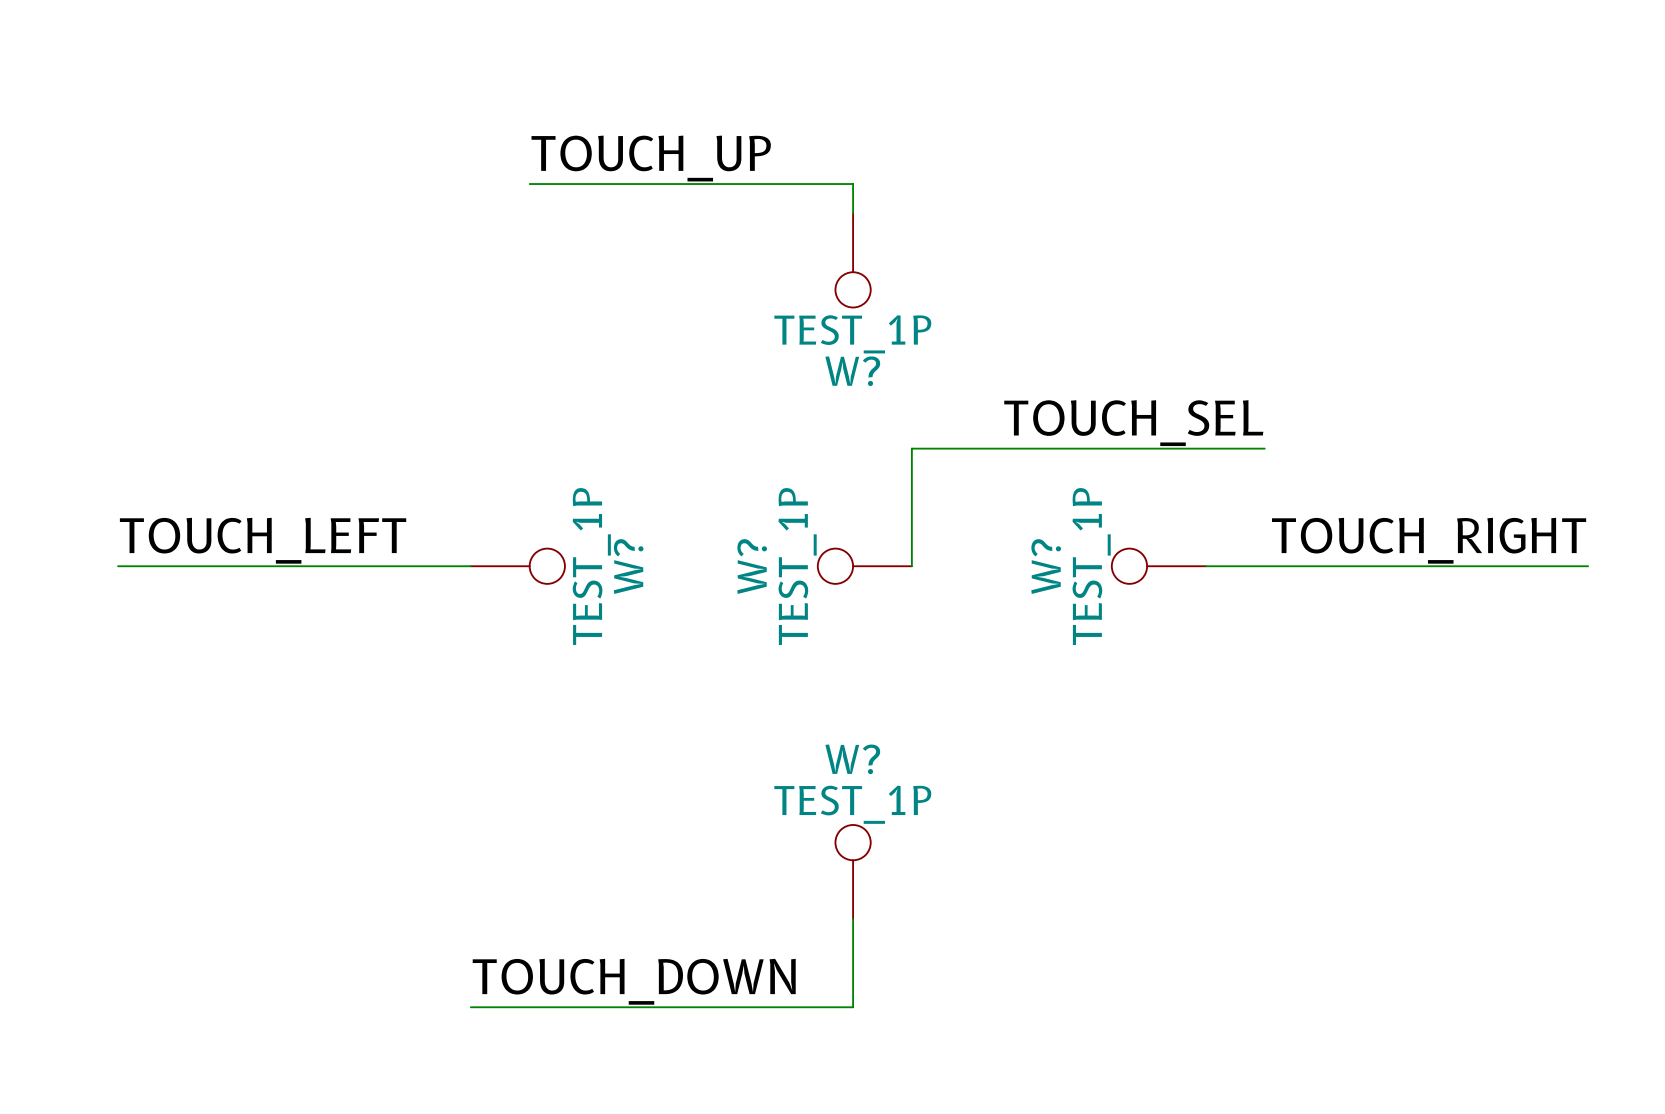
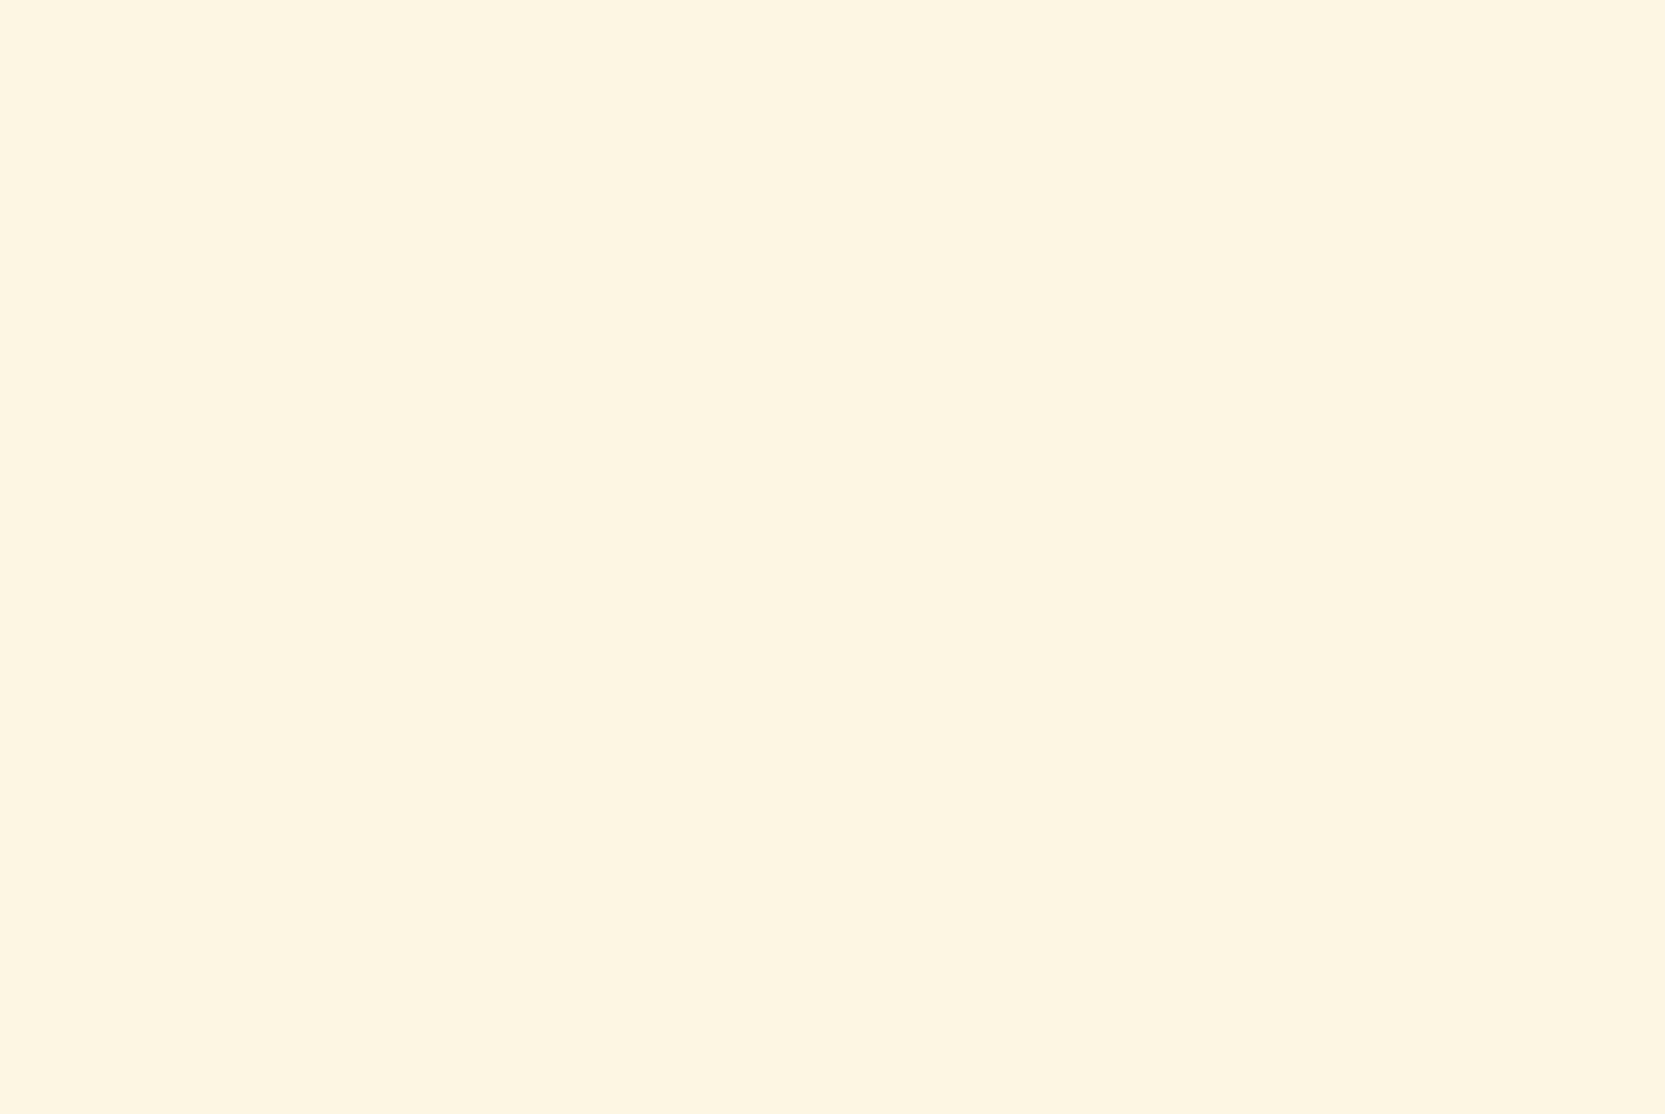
label: TOUCH_UP (651, 158) -> none
wire: (529, 184) (853, 184) (853, 213) -> none
W?: TEST_1P (853, 260) -> none
label: TOUCH_SEL (1133, 423) -> none
wire: (1264, 448) (911, 448) (911, 566) -> none
label: TOUCH_LEFT (263, 540) -> none
label: TOUCH_RIGHT (1429, 540) -> none
wire: (118, 566) (470, 566) -> none
W?: TEST_1P (517, 566) -> none
W?: TEST_1P (864, 566) -> none
W?: TEST_1P (1158, 566) -> none
wire: (1205, 566) (1588, 566) -> none
W?: TEST_1P (853, 872) -> none
wire: (853, 919) (853, 1007) (470, 1007) -> none
label: TOUCH_DOWN (634, 981) -> none

